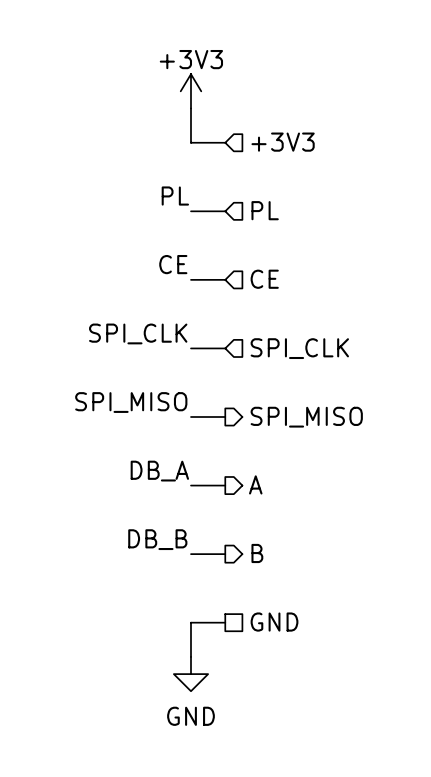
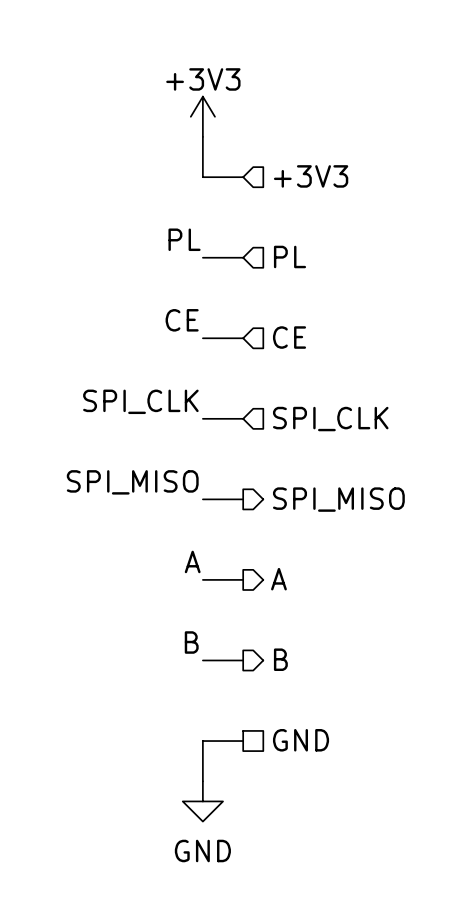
label: DB_A (159, 471) -> A (192, 561)
label: DB_B (157, 539) -> B (191, 642)

